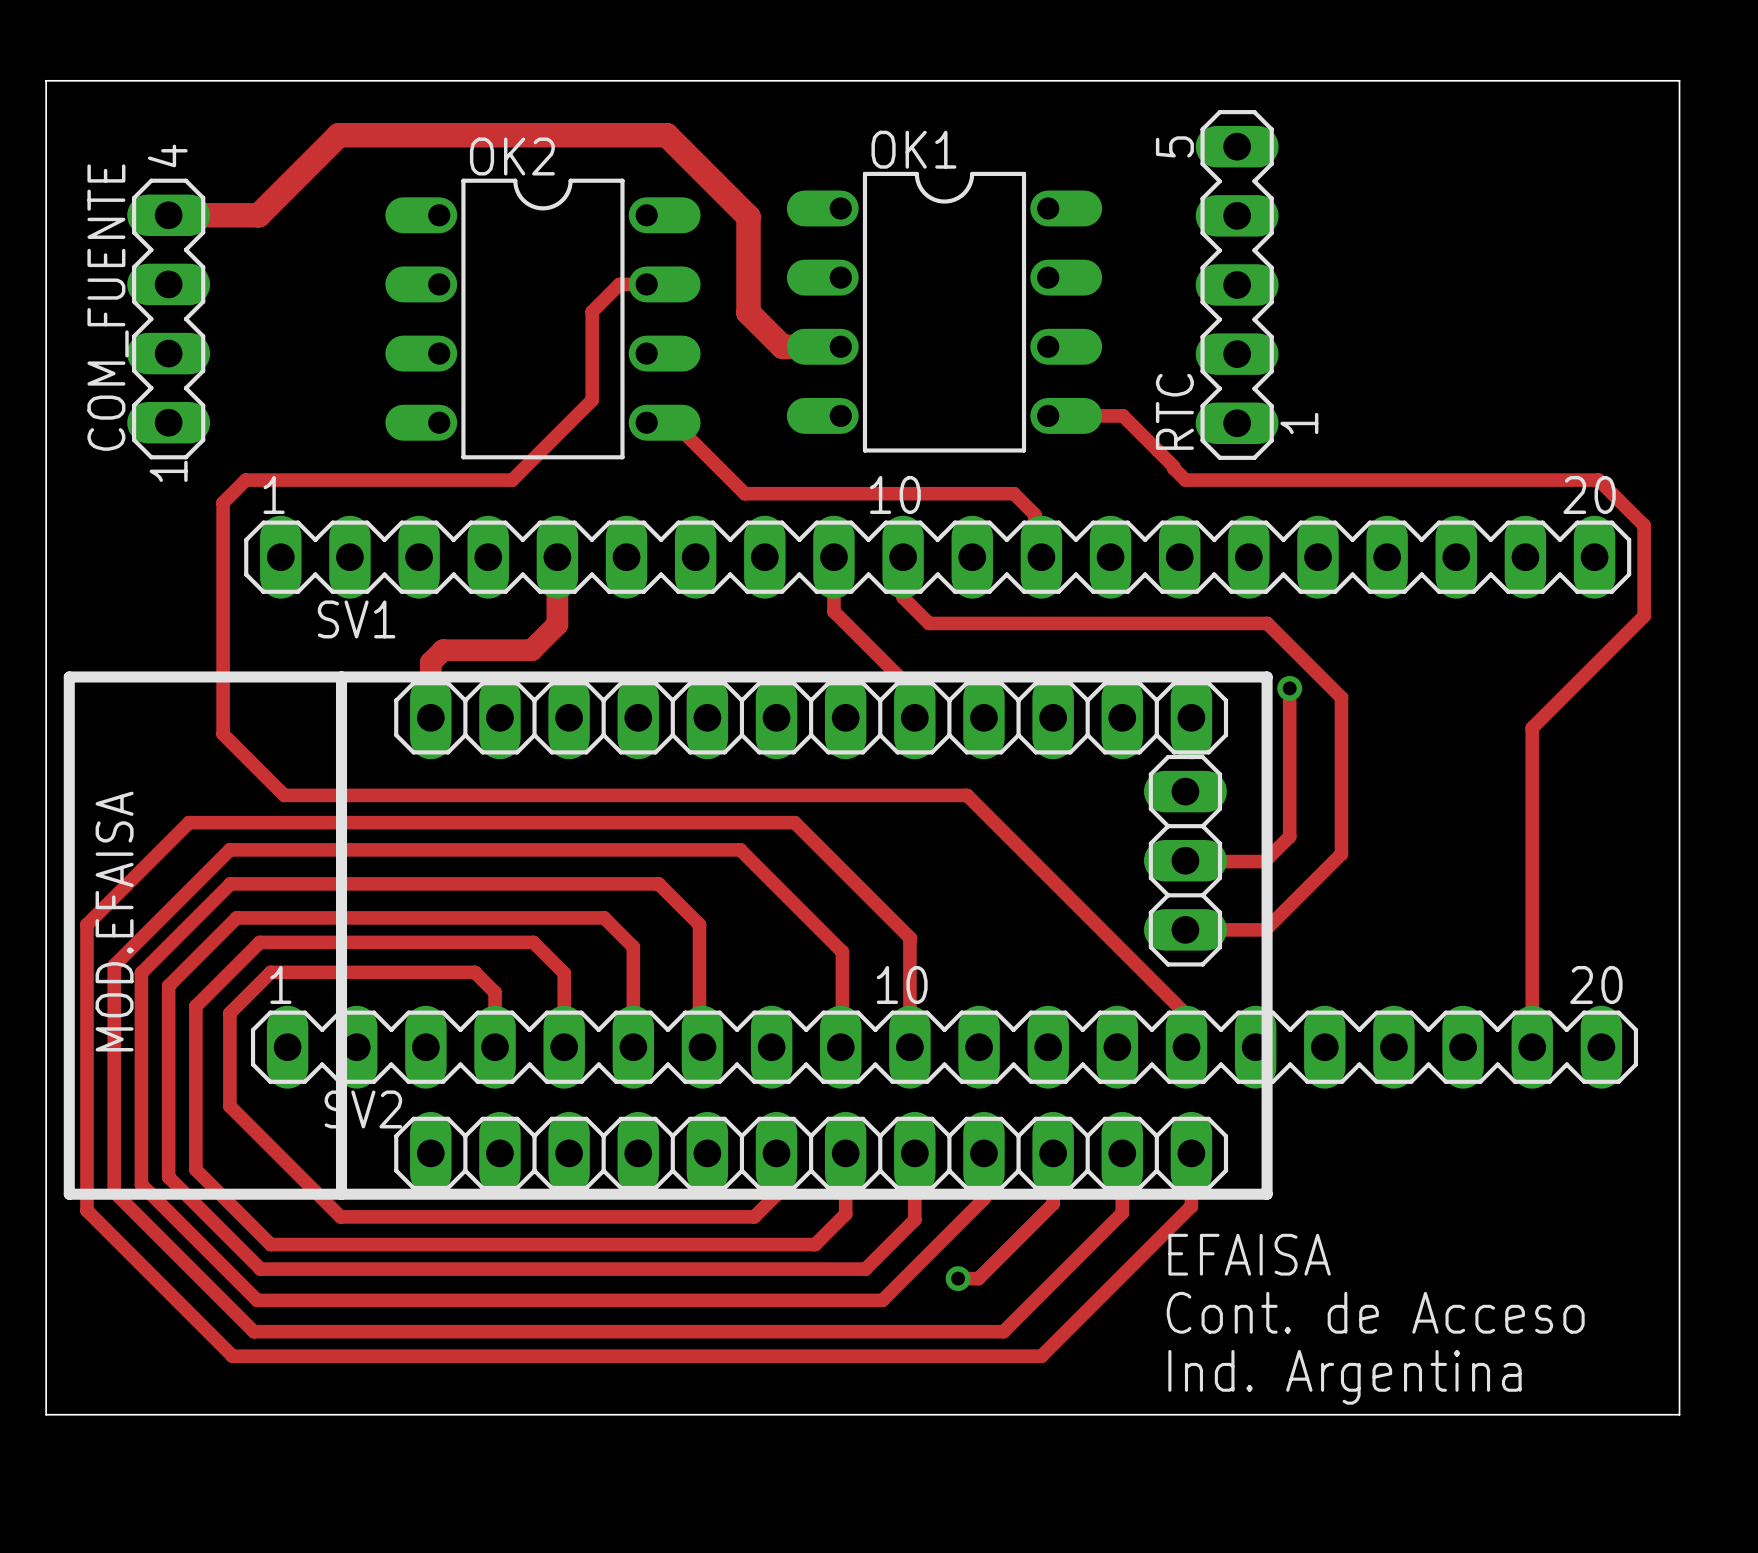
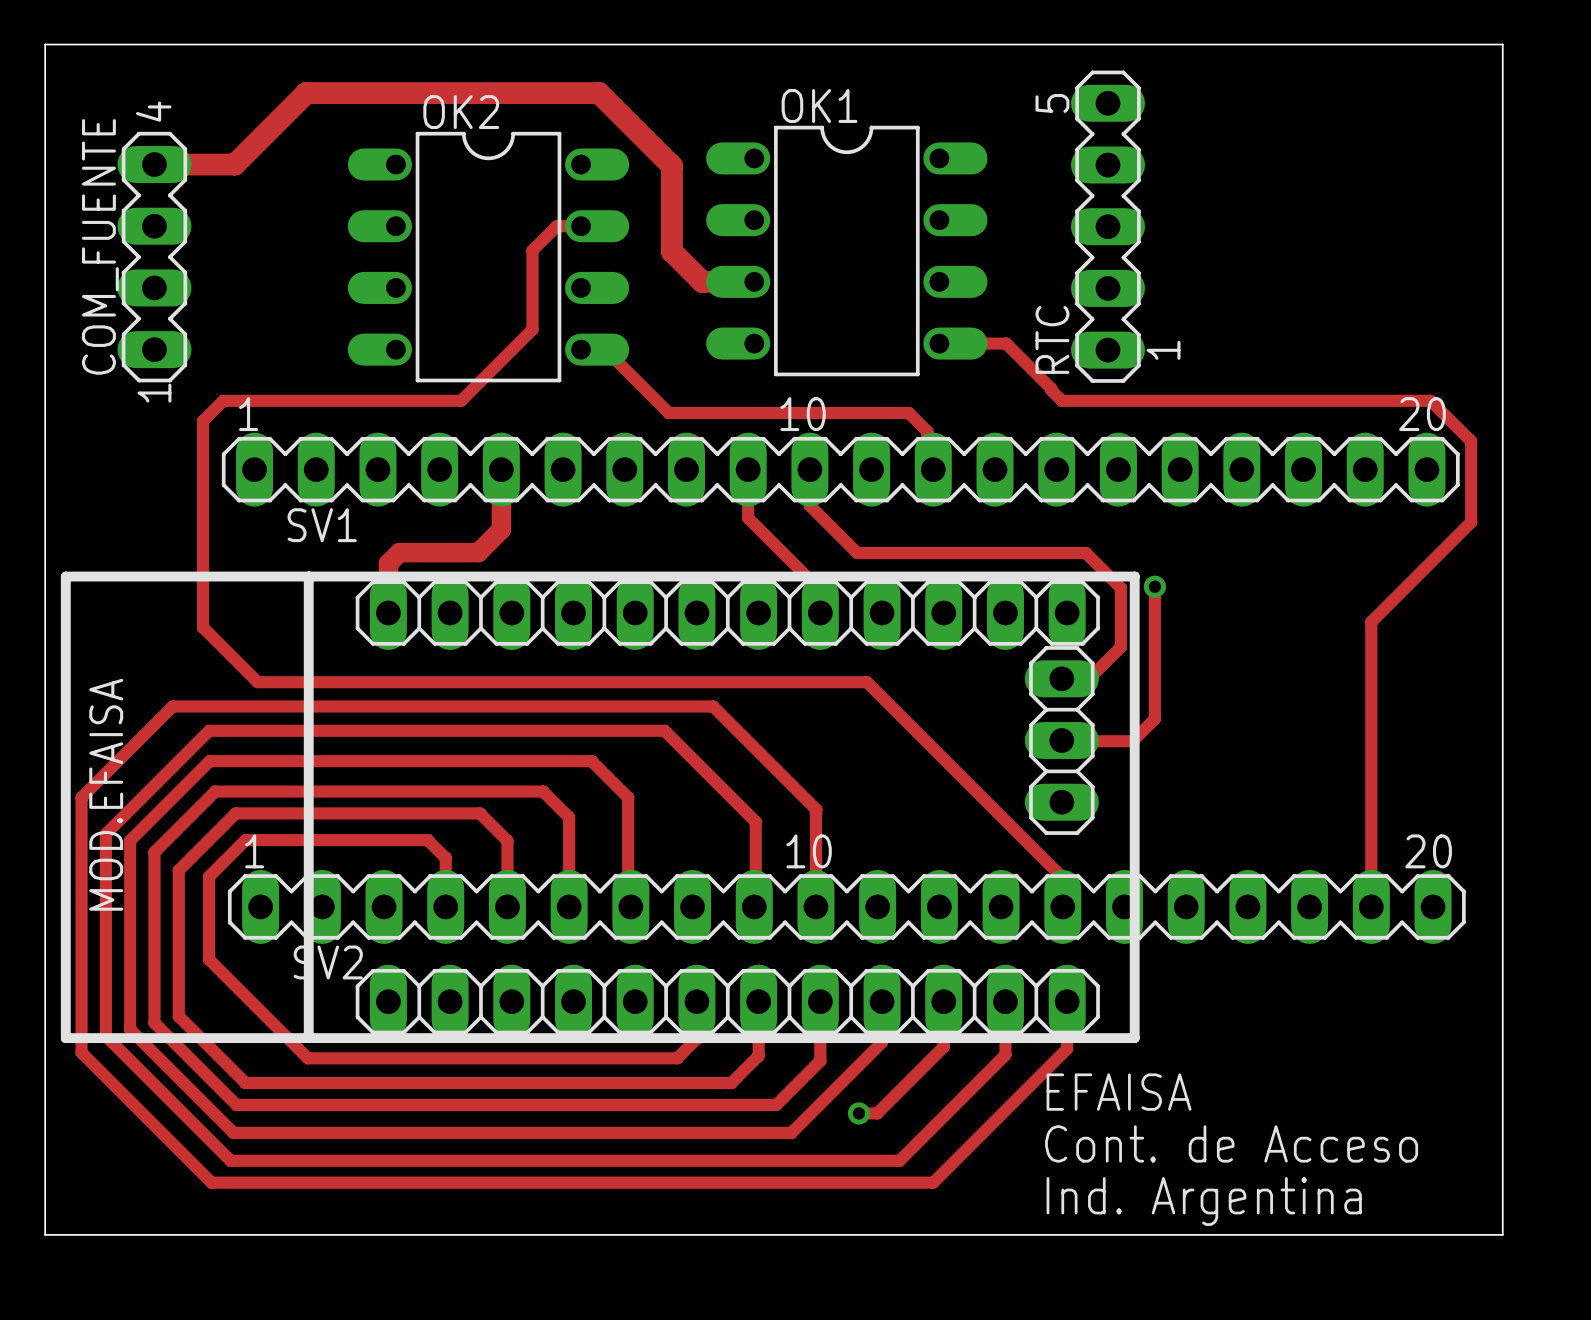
track: (929, 623) (1267, 623) (1341, 697) (1341, 853) (1265, 929) (1185, 929) -> (833, 528) (857, 553) (1085, 553) (1120, 587) (1120, 647) (1089, 678) (1061, 678)

